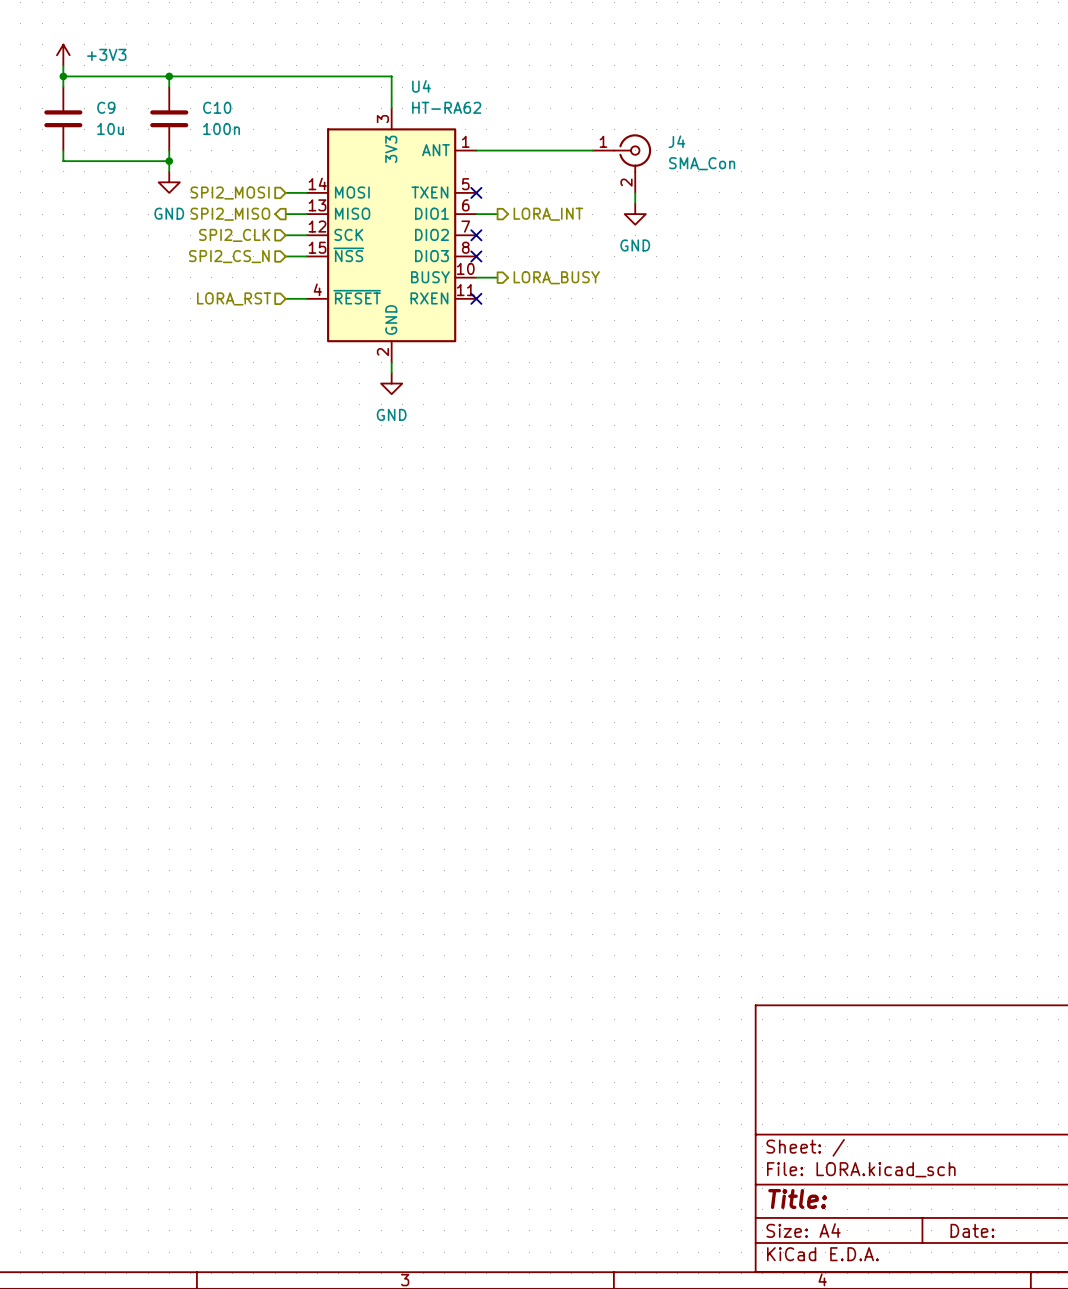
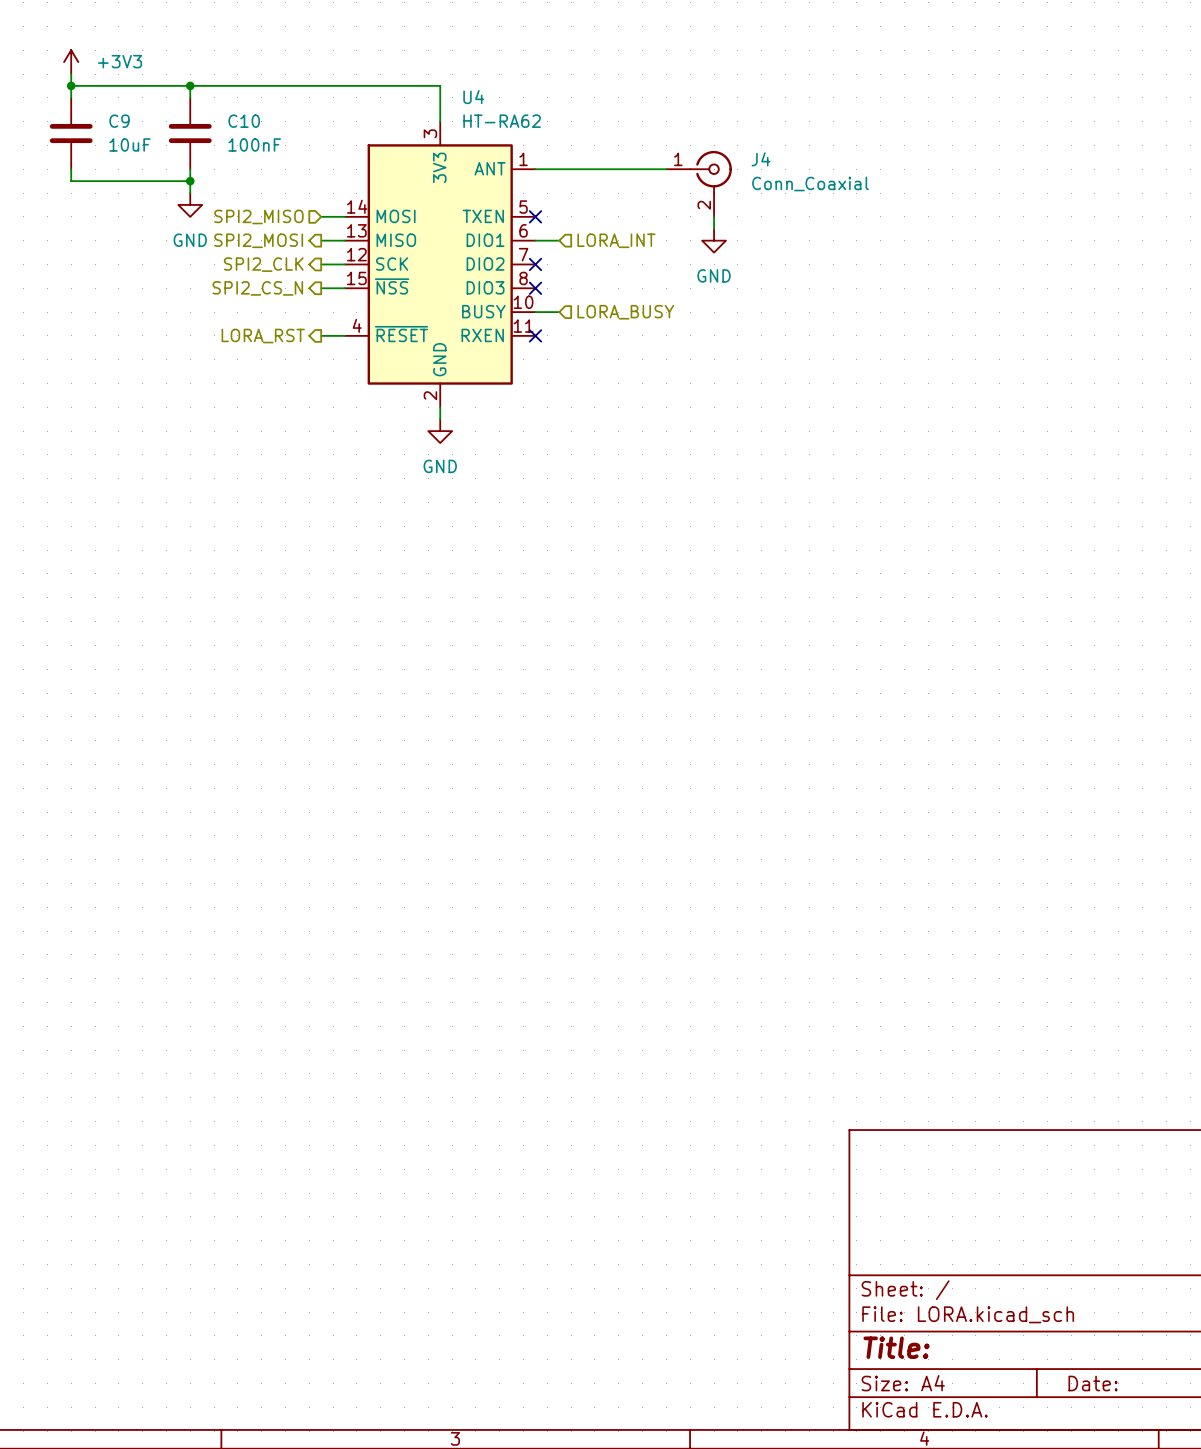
C9 value: 10u (110, 128) -> 10uF (129, 144)
C10 value: 100n (221, 128) -> 100nF (254, 144)
J4 value: SMA_Con (702, 163) -> Conn_Coaxial (810, 184)
hierarchical label: SPI2_MOSI (230, 193) -> SPI2_MISO (258, 216)
hierarchical label: SPI2_MISO (230, 214) -> SPI2_MOSI (258, 240)
hierarchical label shape: output (548, 214) -> input (616, 240)
hierarchical label shape: input (234, 235) -> output (263, 264)
hierarchical label shape: input (229, 256) -> output (257, 288)
hierarchical label shape: output (556, 277) -> input (625, 312)
hierarchical label shape: input (234, 298) -> output (263, 336)

